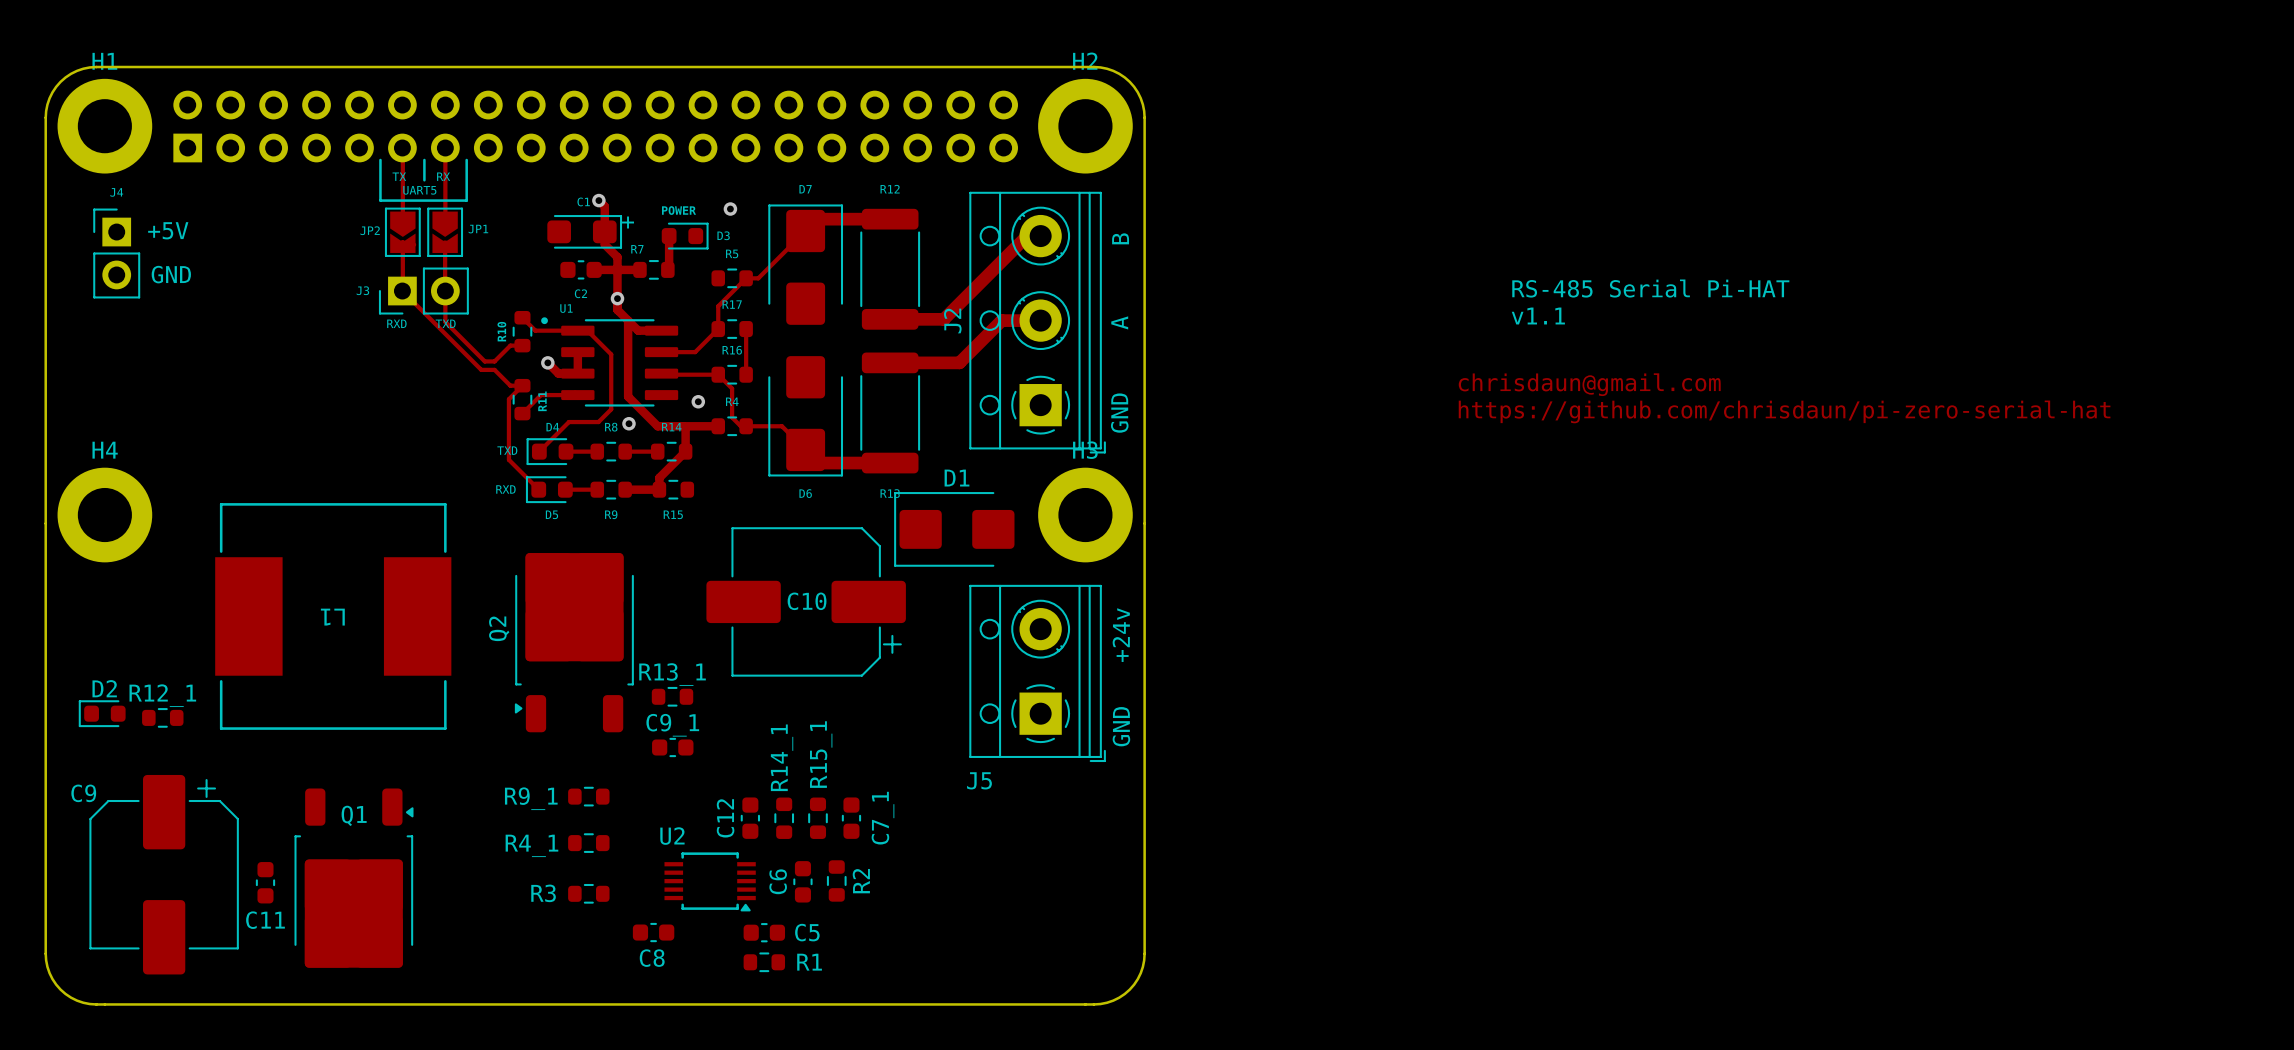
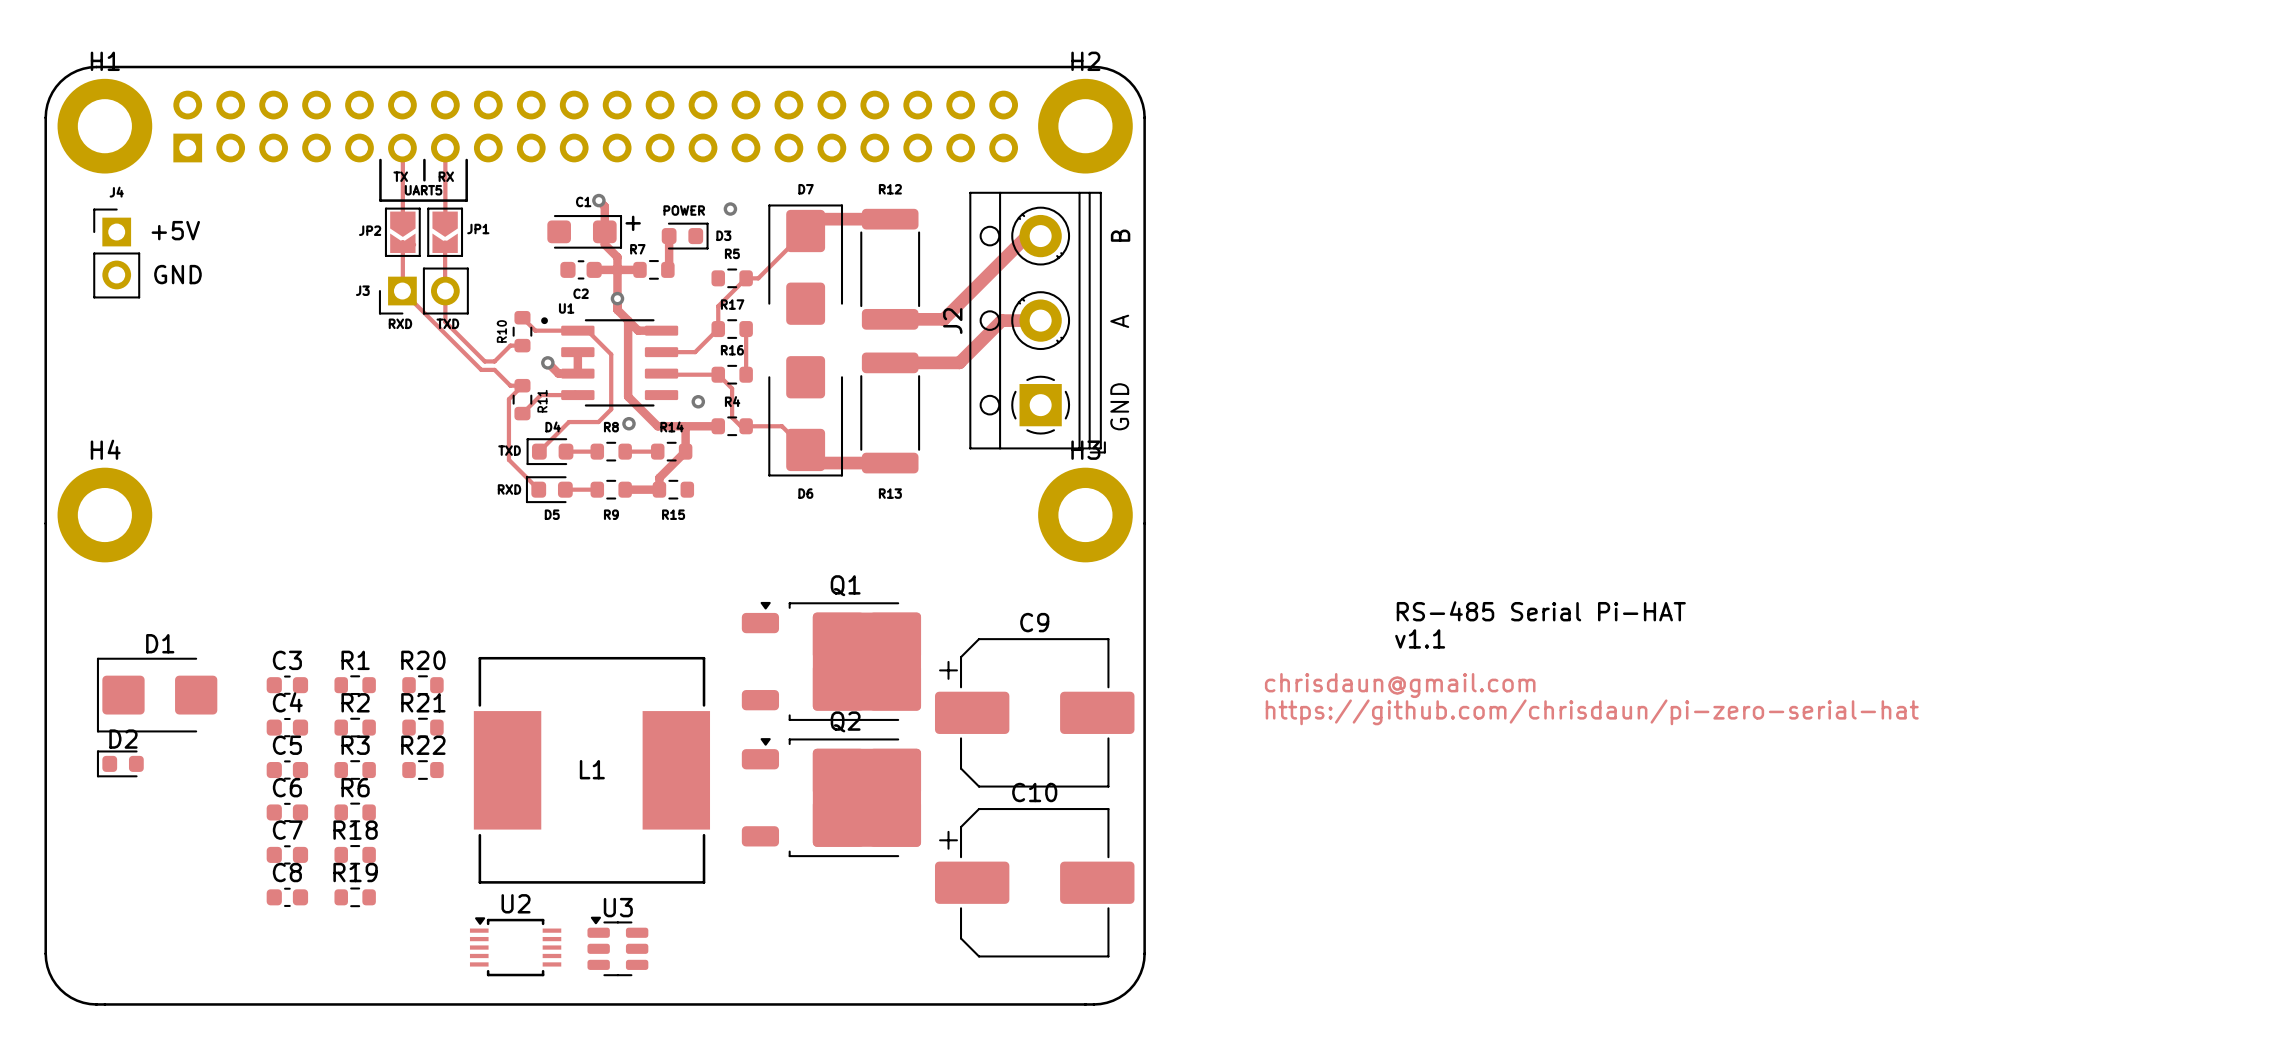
text position: RS-485 Serial Pi-HAT (1650, 288) -> RS-485 Serial Pi-HAT (1541, 611)
text position: v1.1 (1538, 316) -> v1.1 (1420, 638)
text position: chrisdaun@gmail.com (1589, 384) -> chrisdaun@gmail.com (1400, 685)
text position: https://github.com/chrisdaun/pi-zero-serial-hat (1784, 411) -> https://github.com/chrisdaun/pi-zero-serial-hat (1592, 712)
D1 position: (954, 529) -> (157, 695)
C10 rotation: 0° (806, 601) -> 180° (1034, 882)
C10 position: (806, 601) -> (1034, 882)
C10 name position: C10 (807, 601) -> C10 (1034, 792)
L1 position: (333, 616) -> (591, 770)
L1 name rotation: 0° (332, 617) -> 180° (592, 769)
text: +24v (1121, 635) -> none
Q2 rotation: 0° (574, 642) -> 90° clockwise (831, 797)
Q2 position: (574, 642) -> (831, 797)
J5: (1037, 673) -> none
C3: none -> (287, 685)
R20: none -> (422, 685)
R13_1: (672, 696) -> none
D2 position: (102, 713) -> (120, 763)
R12_1: (162, 717) -> none
text: GND (1121, 726) -> none
C4: none -> (287, 727)
R21: none -> (422, 727)
C9_1: (672, 747) -> none
R22: none -> (422, 770)
C9 name position: C9 (83, 793) -> C9 (1034, 622)
R9_1: (588, 796) -> none
R6: none -> (355, 812)
C12: (750, 818) -> none
R14_1: (784, 818) -> none
R15_1: (817, 818) -> none
C7_1: (851, 818) -> none
U2 name position: U2 (672, 836) -> U2 (516, 903)
R4_1: (588, 843) -> none
C7: none -> (287, 854)
R18: none -> (355, 854)
C9 rotation: 0° (164, 874) -> 90° counterclockwise (1034, 712)
C9 position: (164, 874) -> (1034, 712)
Q1 rotation: 0° (354, 878) -> 90° counterclockwise (831, 661)
Q1 position: (354, 878) -> (831, 661)
R2 rotation: 0° (836, 880) -> 90° clockwise (355, 727)
R2 position: (836, 880) -> (355, 727)
U2 rotation: 0° (710, 881) -> 180° (515, 946)
U2 position: (710, 881) -> (515, 946)
C6 rotation: 0° (802, 881) -> 90° clockwise (287, 812)
C6 position: (802, 881) -> (287, 812)
R2 name position: R2 (861, 881) -> R2 (355, 702)
C11: (265, 882) -> none
R3 name position: R3 (543, 893) -> R3 (355, 745)
R3 position: (588, 893) -> (355, 770)
R19: none -> (355, 897)
C8 position: (653, 932) -> (287, 897)
C5 position: (764, 932) -> (287, 770)
C5 name position: C5 (807, 932) -> C5 (287, 745)
U3: none -> (617, 946)
C8 name position: C8 (652, 958) -> C8 (287, 872)
R1 position: (764, 962) -> (355, 685)
R1 name position: R1 (809, 962) -> R1 (355, 660)

